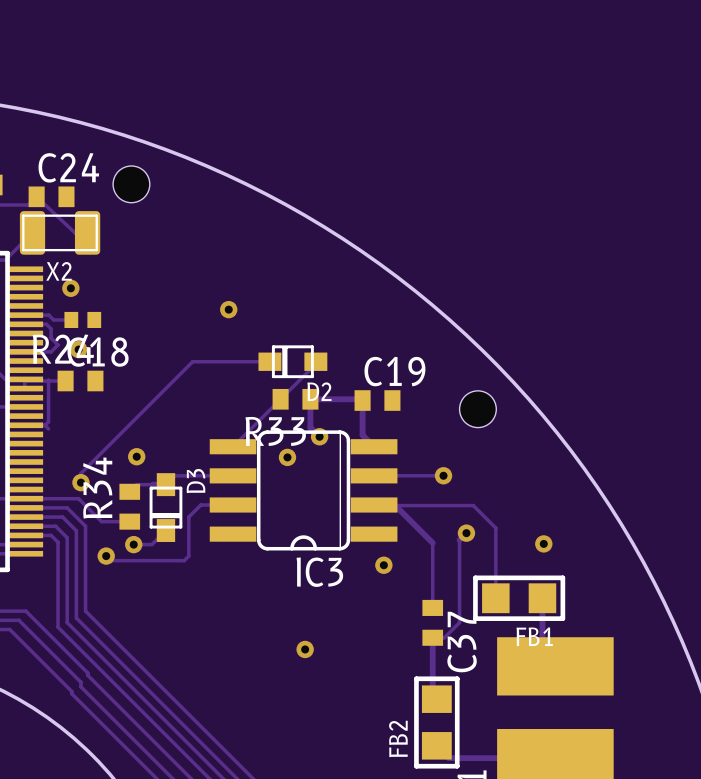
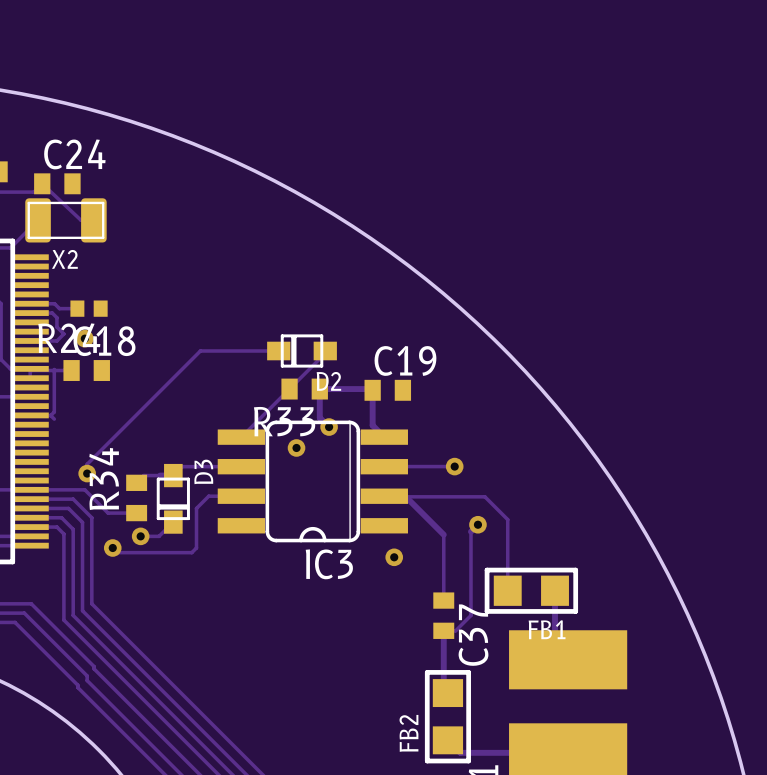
hole: (131, 184) -> none
via: (70, 288) -> none
via: (228, 309) -> none
hole: (477, 409) -> none
via: (136, 456) -> none
via: (543, 543) -> none
via: (305, 649) -> none

